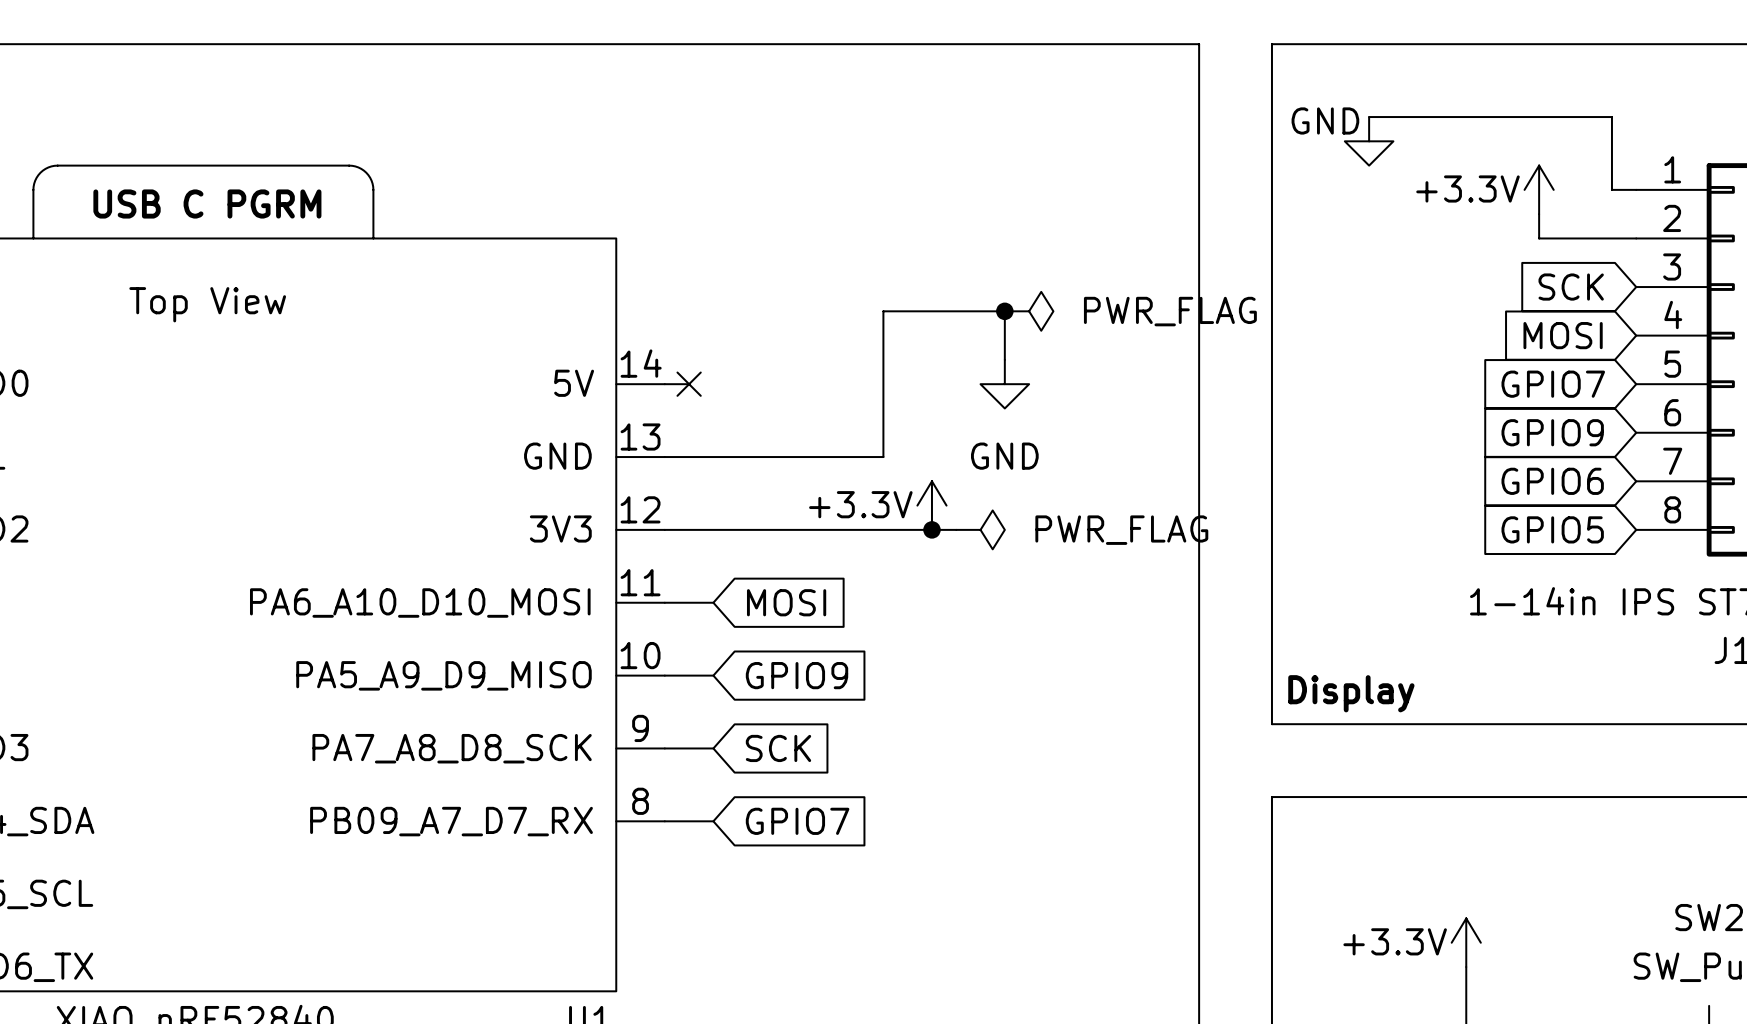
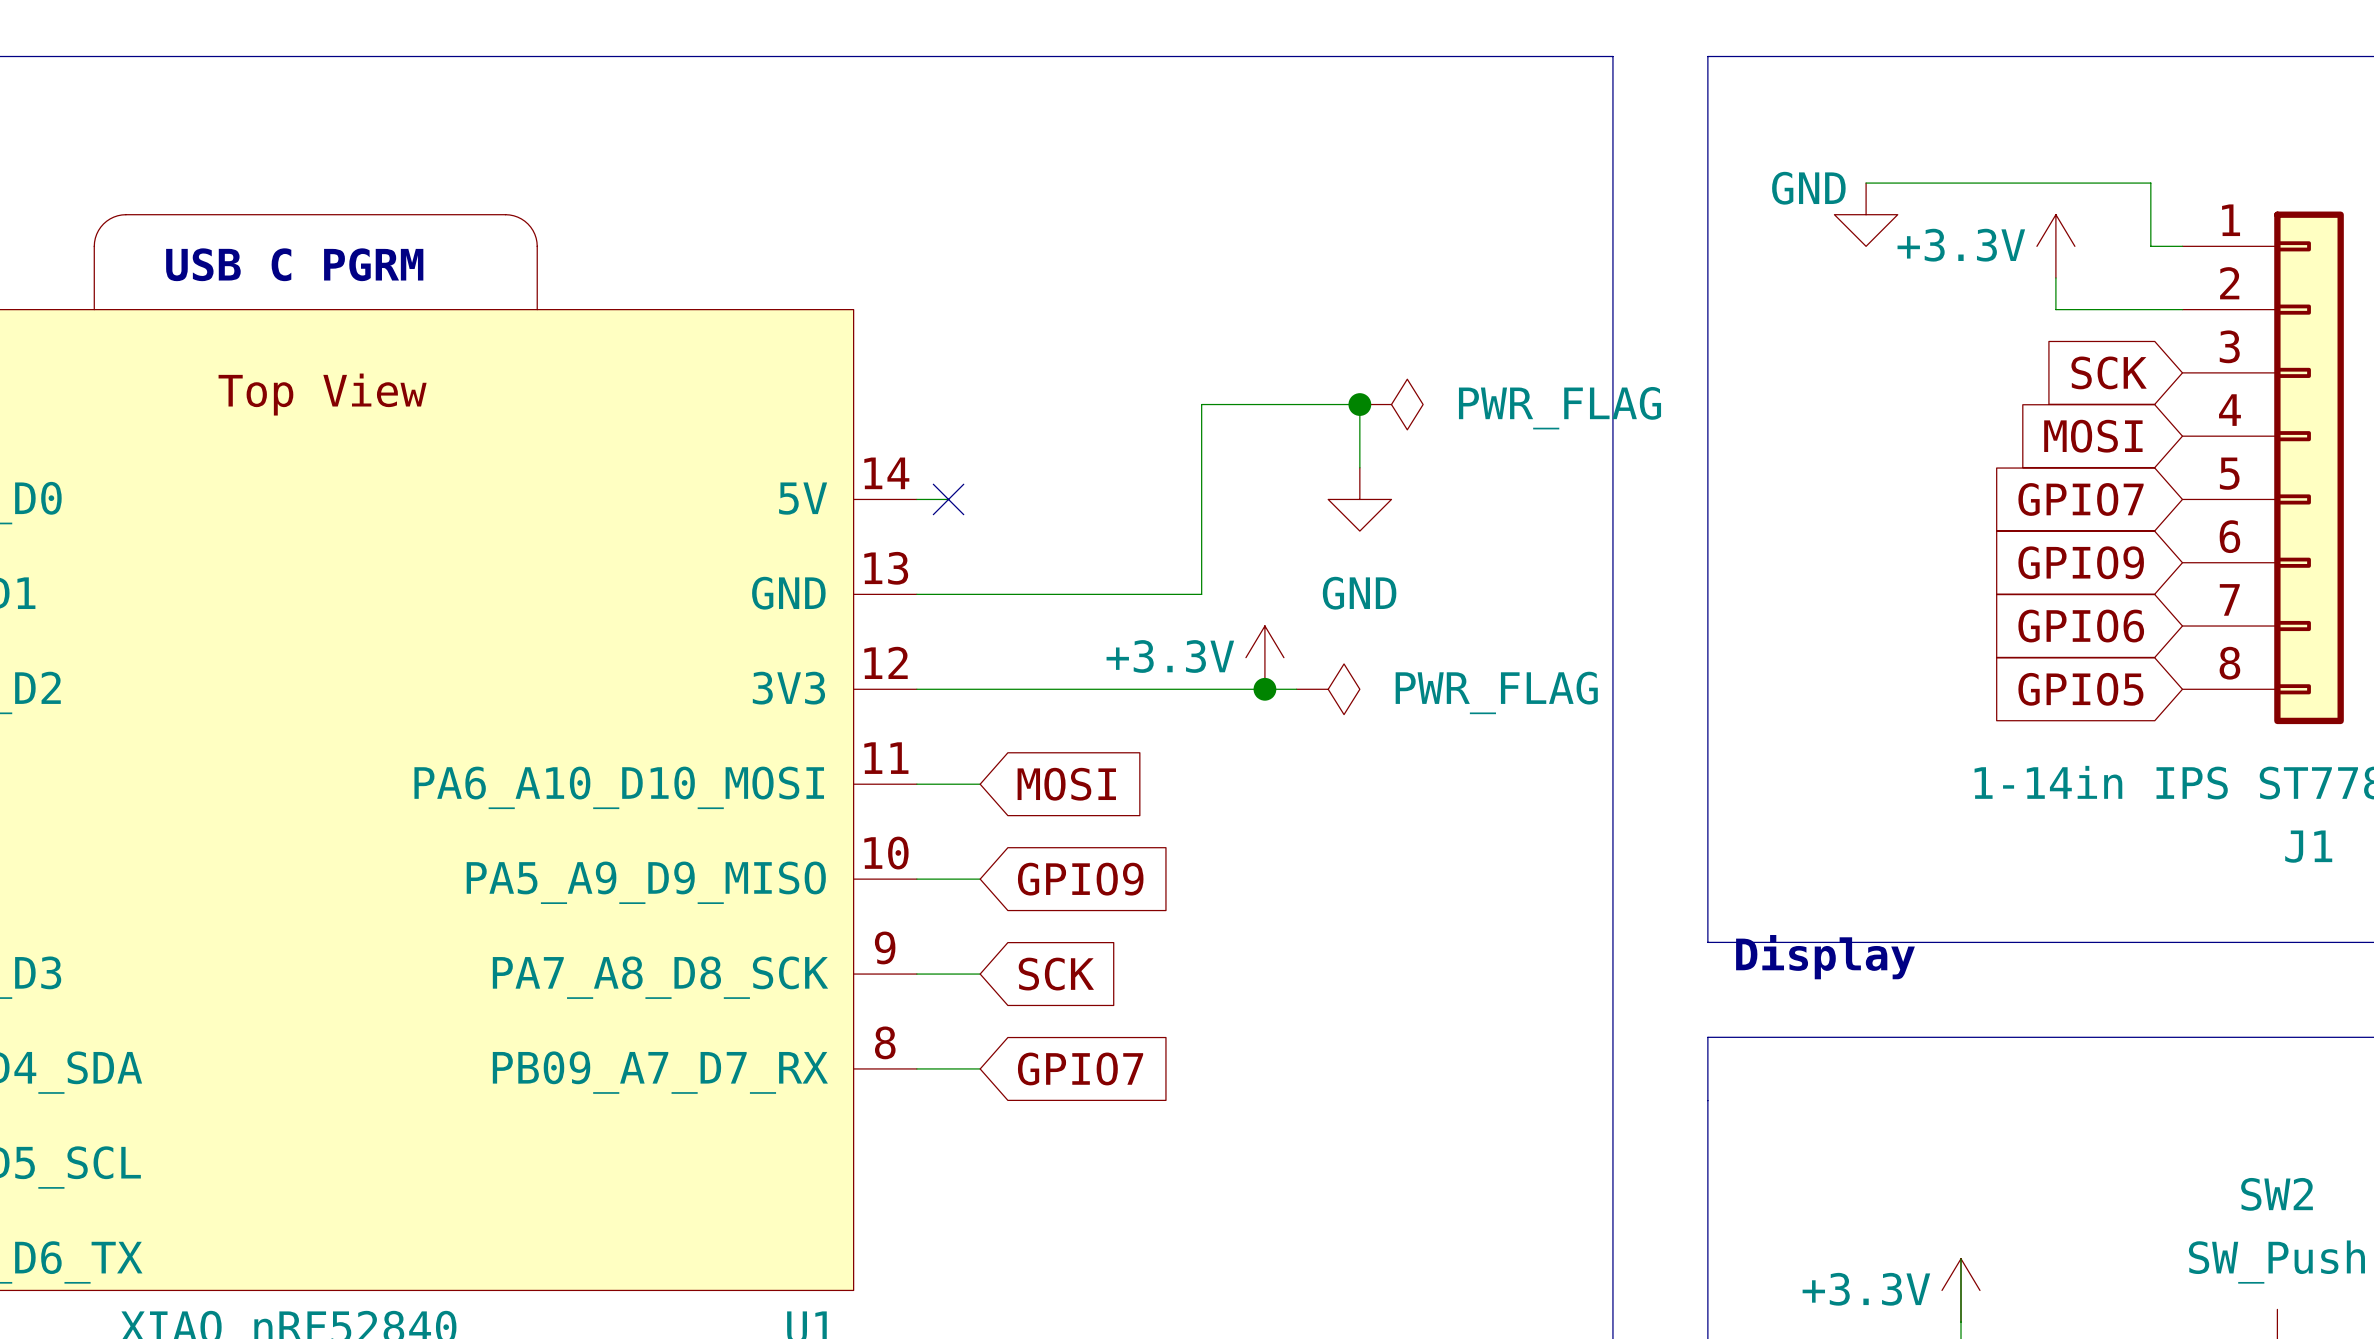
wire: (1369, 117) (1611, 117) (1611, 141) -> (1866, 183) (2150, 183)
power symbol position: GND (1369, 141) -> GND (1866, 214)
text position: Display (1351, 693) -> Display (1825, 957)
power symbol position: +3.3V (1466, 942) -> +3.3V (1961, 1290)

